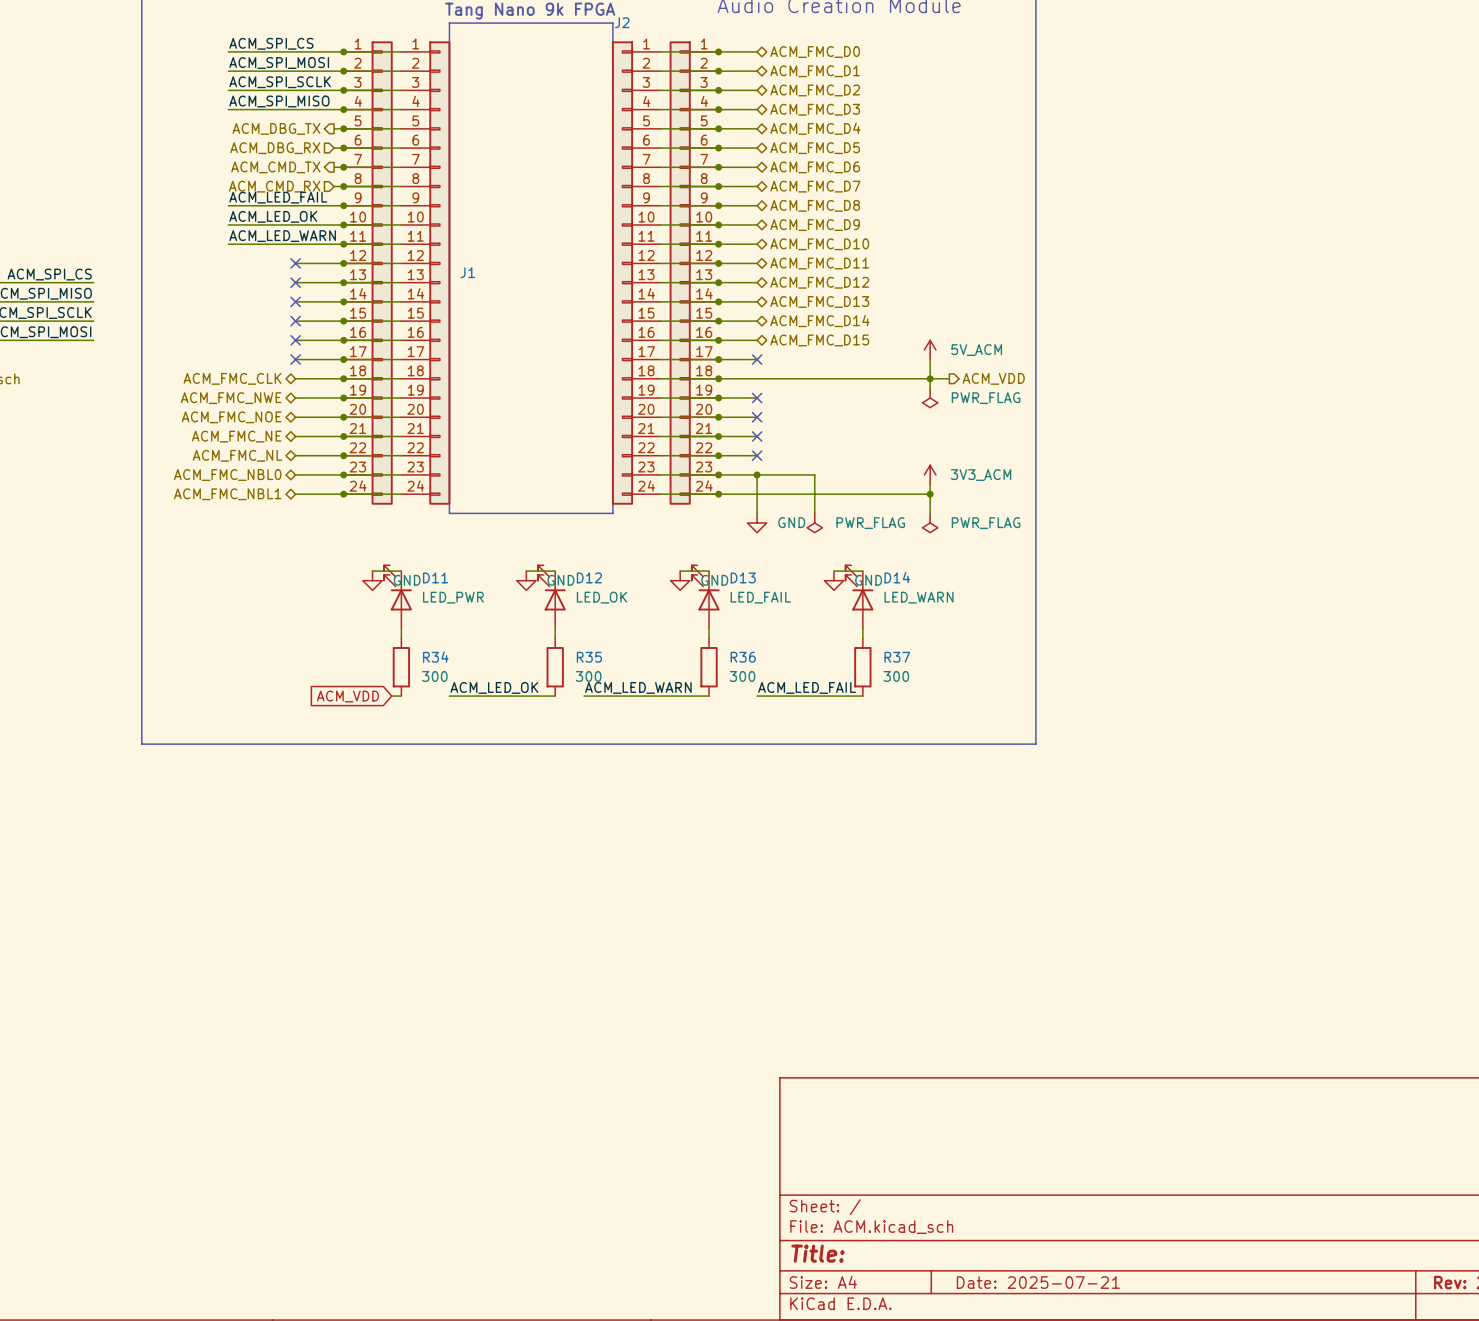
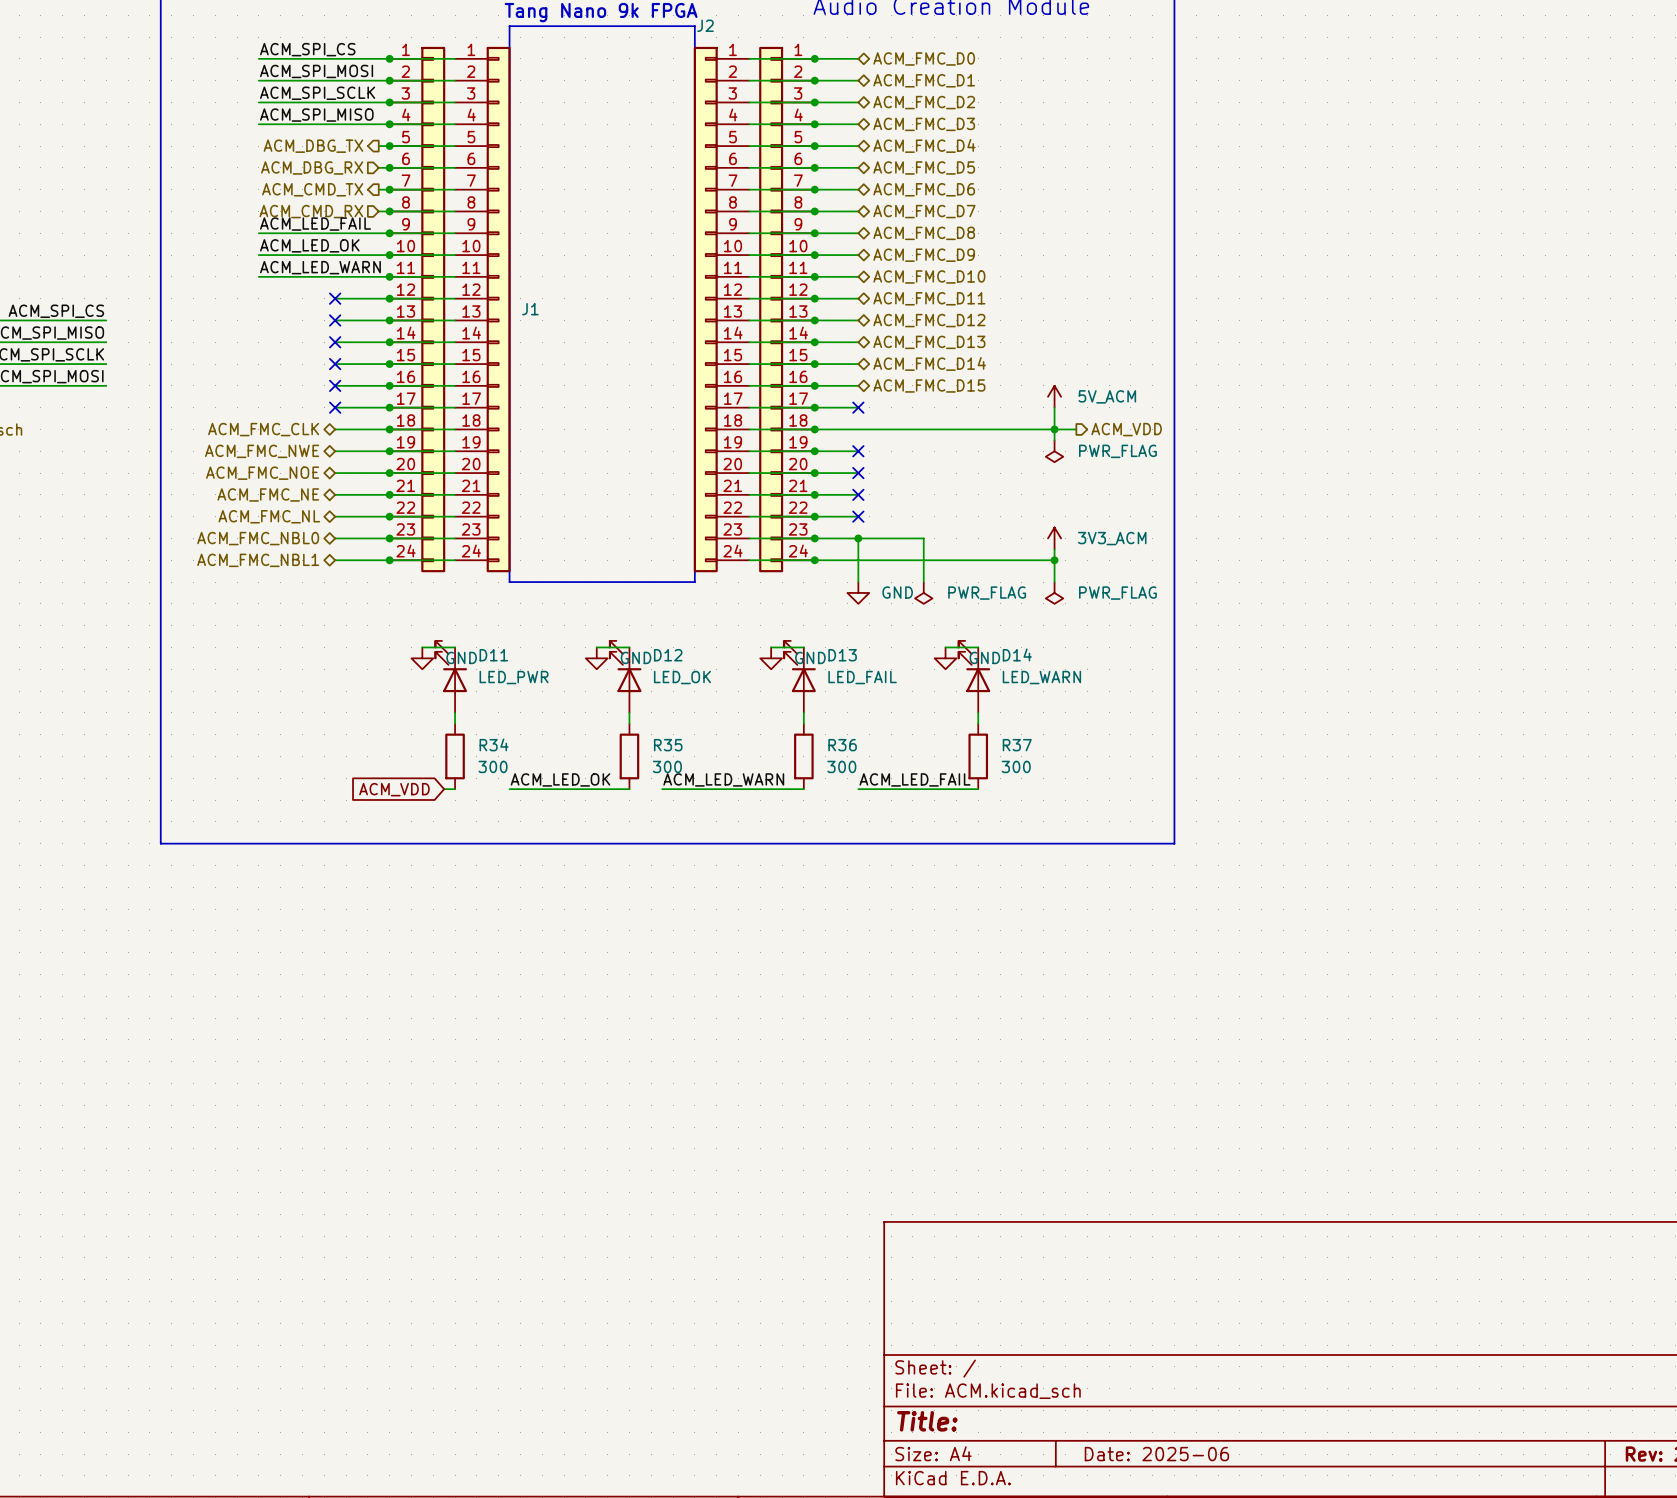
title block: Date: 2025-07-21 (1038, 1282) -> Date: 2025-06 (1156, 1454)

